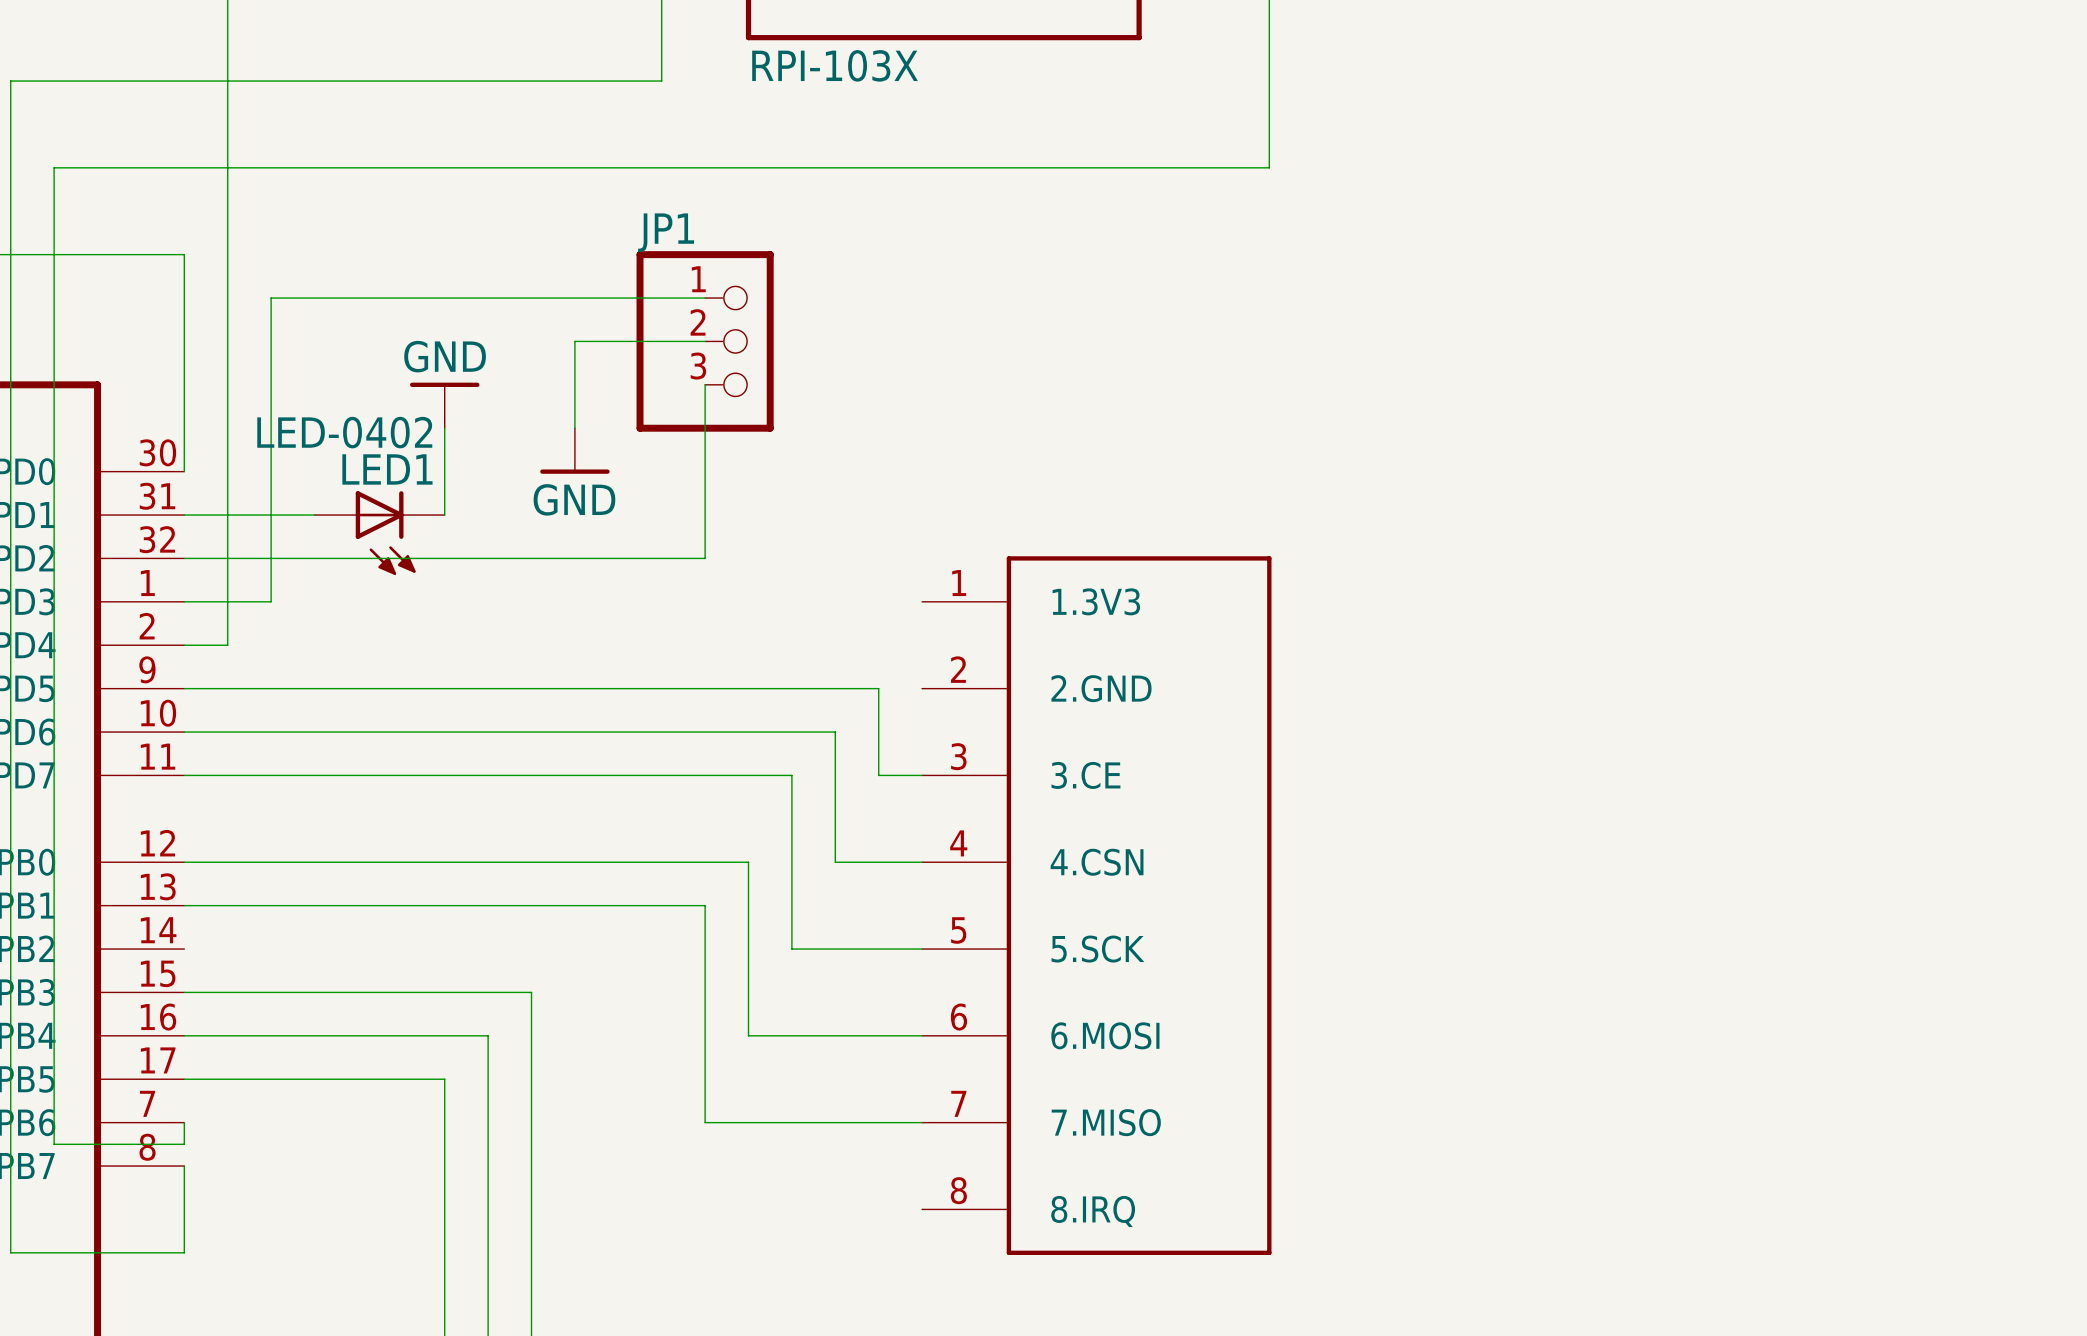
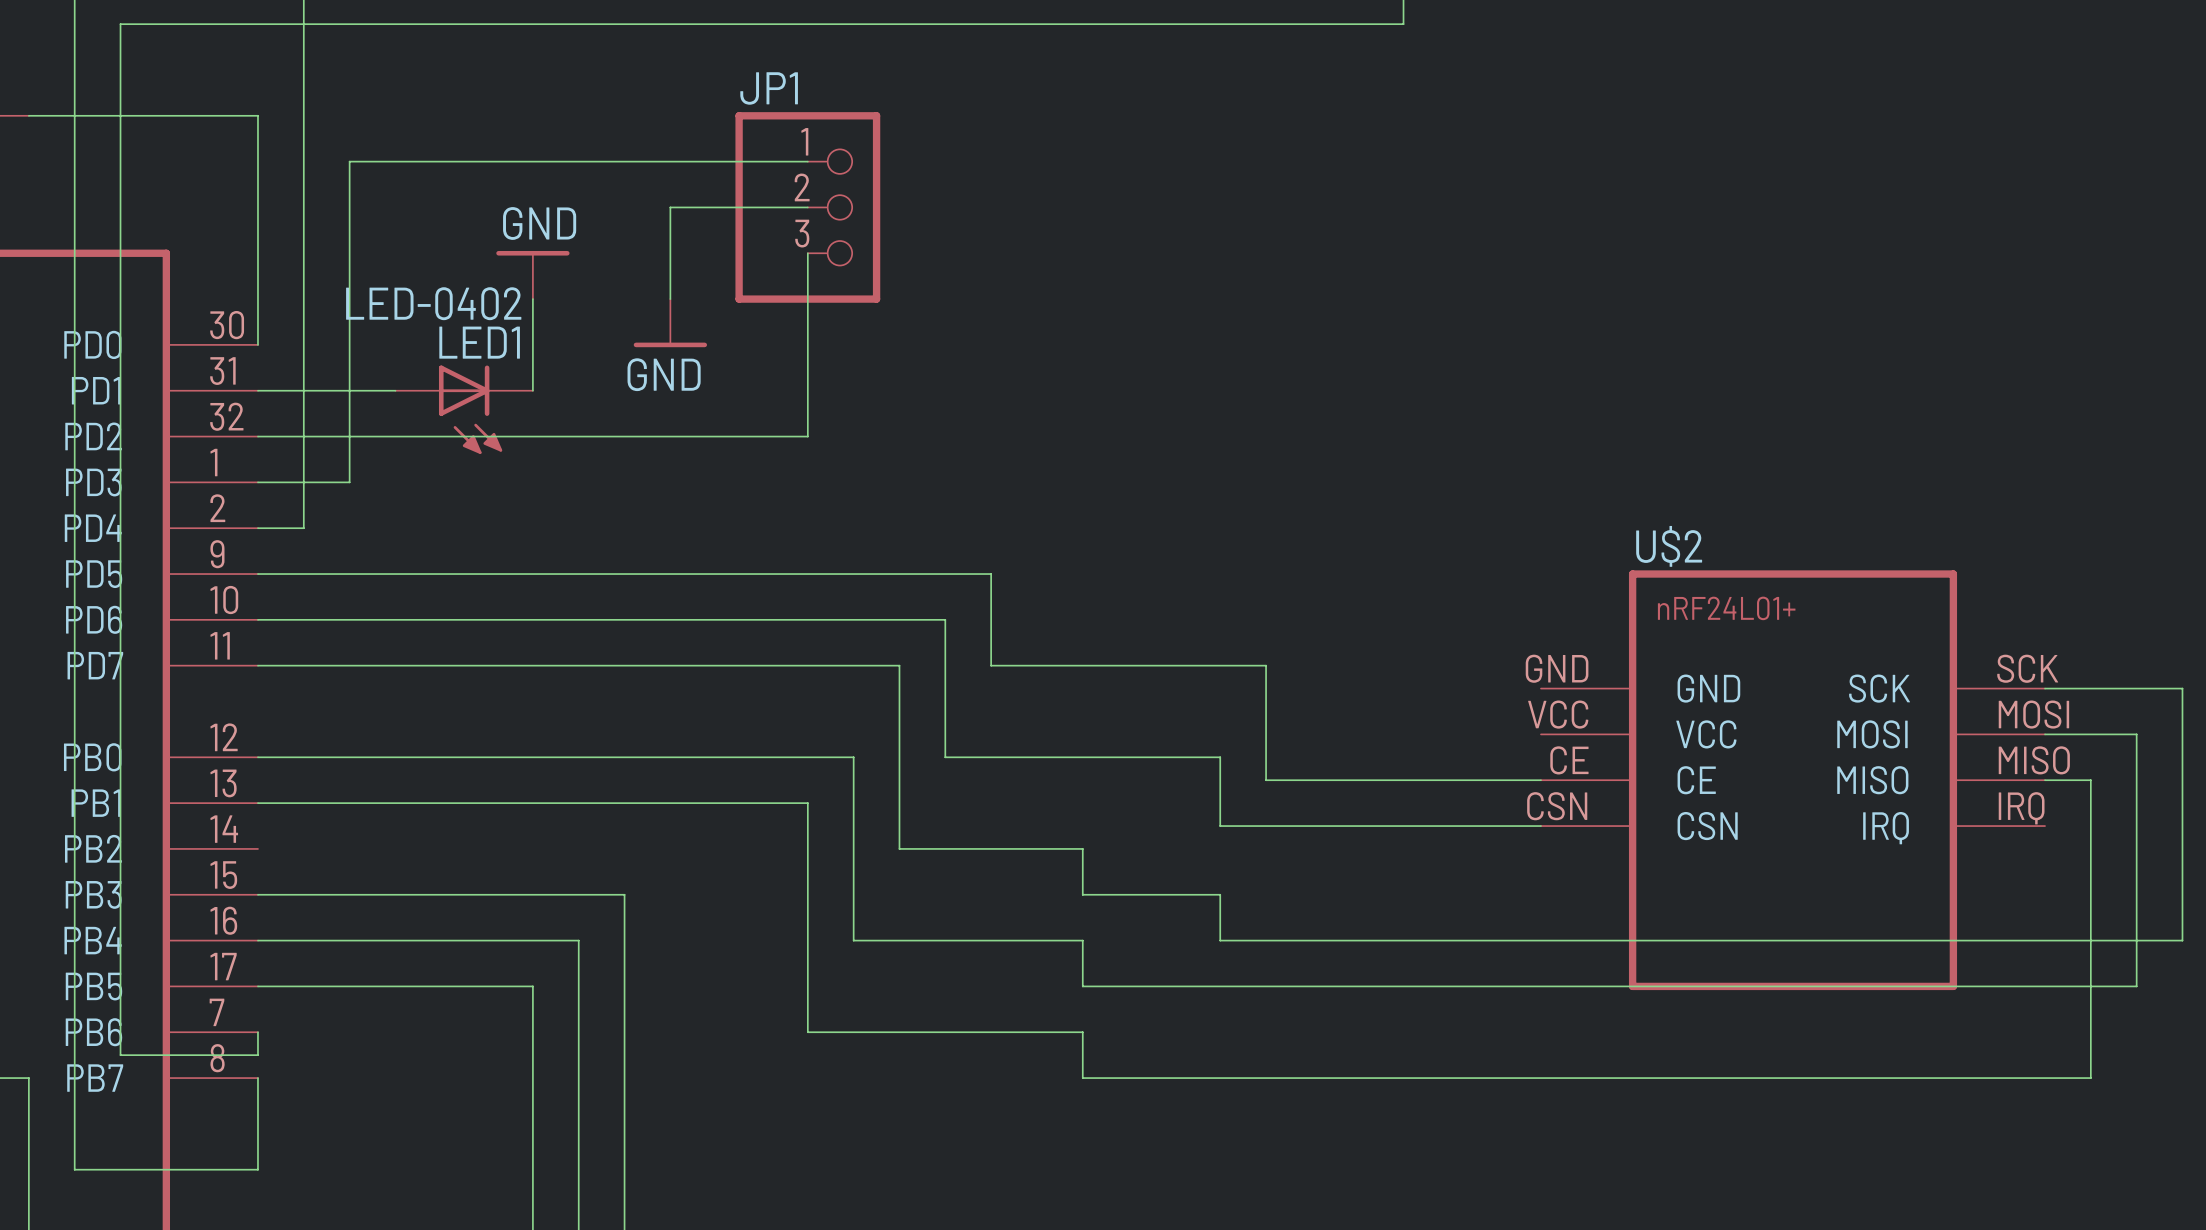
wire: none -> (1036, 665) (1266, 665) (1266, 780) (1540, 780)
wire: none -> (2045, 688) (2182, 688) (2182, 940) (1220, 940) (1220, 894) (1082, 894) (1082, 848) (1036, 848)
wire: none -> (2045, 734) (2136, 734) (2136, 986) (1082, 986) (1082, 940) (1036, 940)
wire: none -> (1036, 757) (1220, 757) (1220, 826) (1540, 826)
U$2: none -> (1793, 780)
wire: none -> (2045, 780) (2090, 780) (2090, 1078) (1082, 1078) (1082, 1032) (1036, 1032)
part: (1096, 905) -> none

